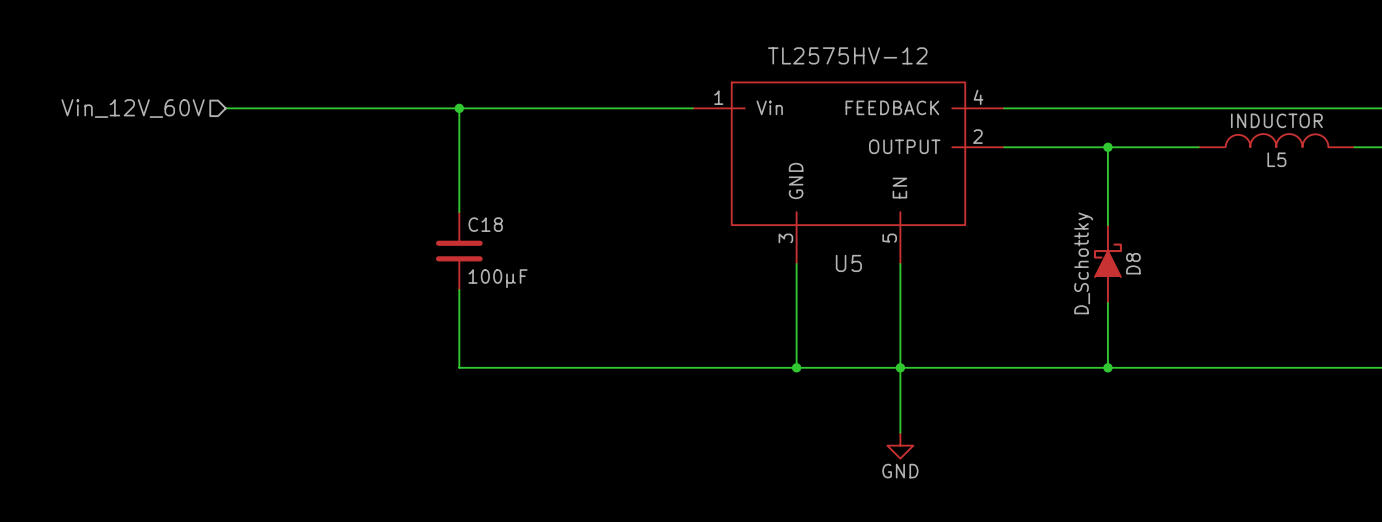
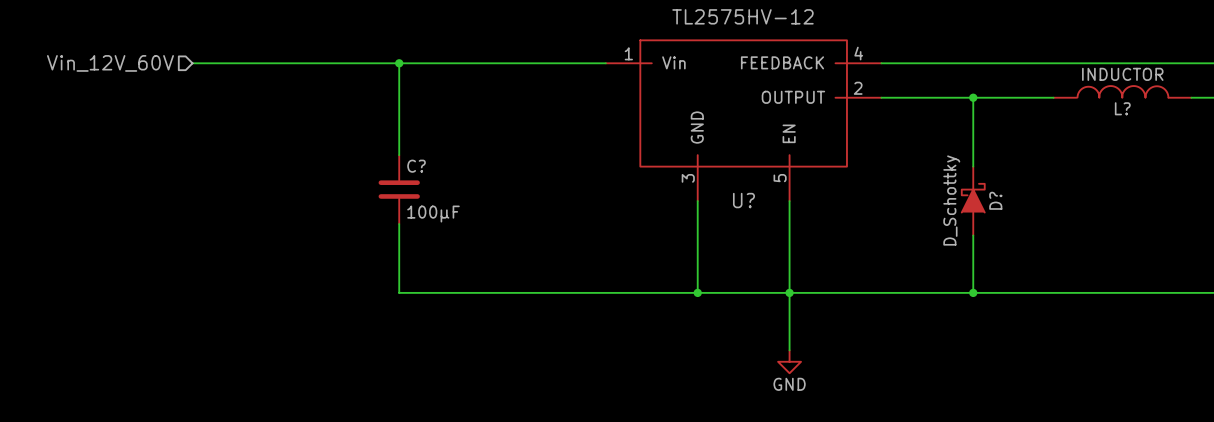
L5 name: L5 (1276, 159) -> L? (1122, 108)
C18 name: C18 (485, 224) -> C? (416, 166)
U5 name: U5 (848, 263) -> U? (743, 200)
D8 name: D8 (1133, 263) -> D? (995, 200)

